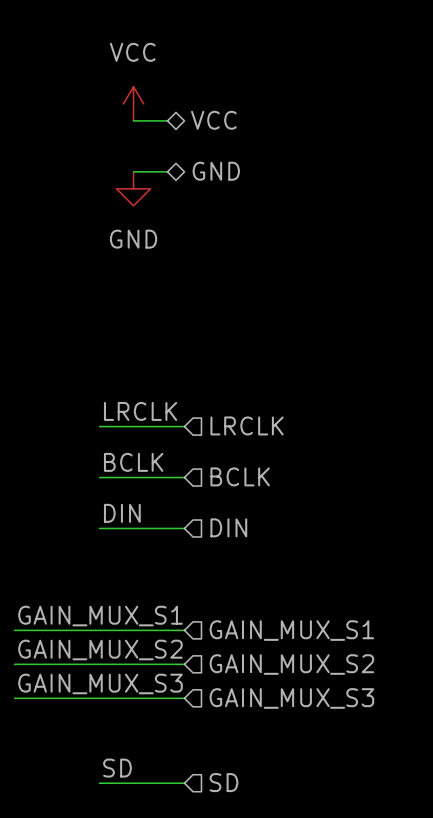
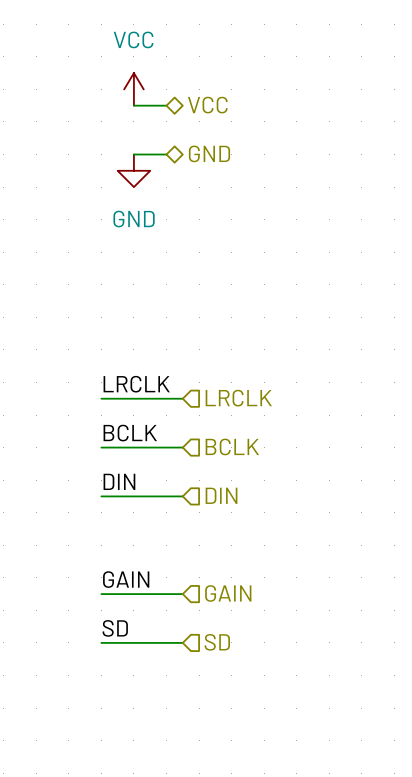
label: none -> GAIN (126, 579)
label: GAIN_MUX_S1 (100, 616) -> none
wire: (14, 630) (99, 630) -> (101, 642) (182, 642)
hierarchical label: GAIN_MUX_S1 (291, 630) -> GAIN (228, 593)
label: GAIN_MUX_S2 (100, 650) -> none
wire: (14, 664) (184, 664) -> none
hierarchical label: GAIN_MUX_S2 (291, 664) -> none
label: GAIN_MUX_S3 (100, 683) -> none
wire: (14, 698) (184, 698) -> none
hierarchical label: GAIN_MUX_S3 (291, 698) -> none
label position: SD (117, 768) -> SD (115, 628)
hierarchical label position: SD (223, 782) -> SD (217, 642)
wire: (99, 783) (184, 783) -> none

